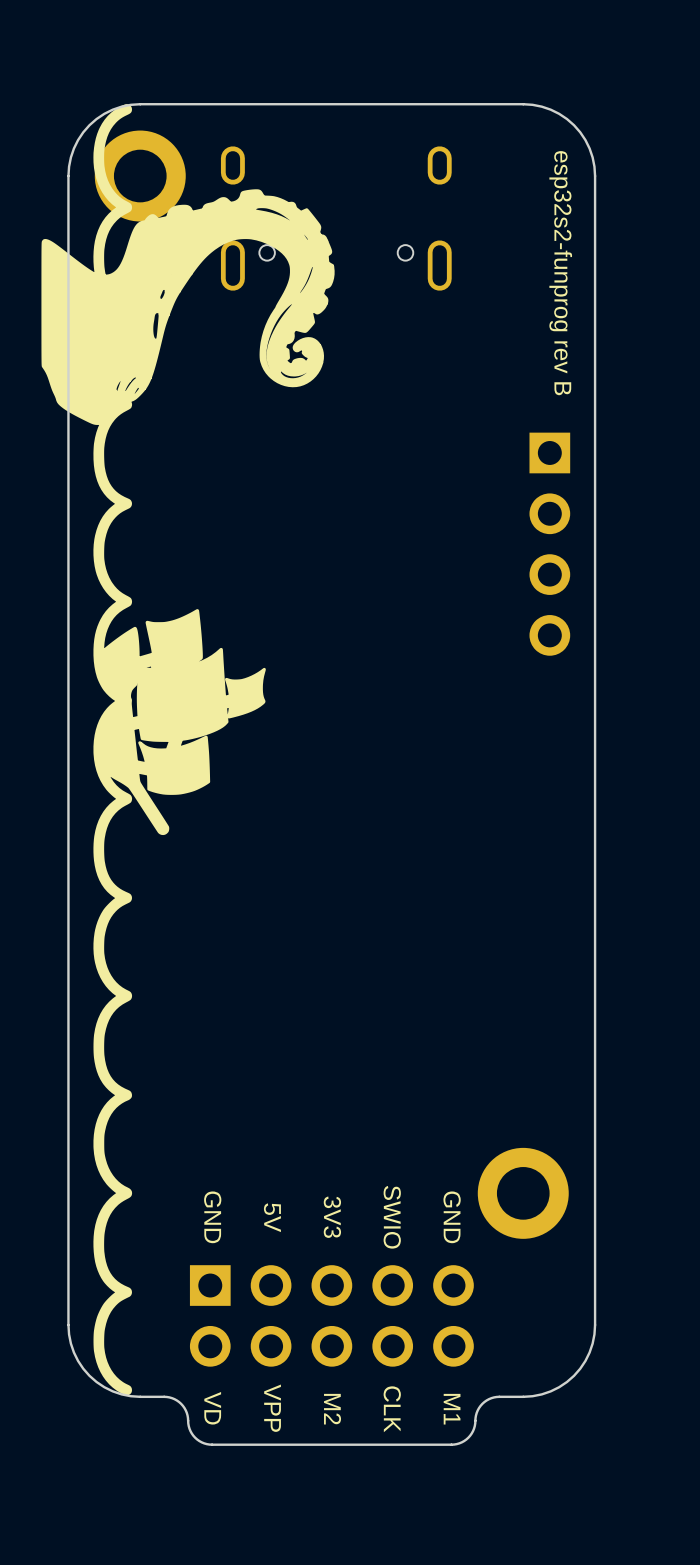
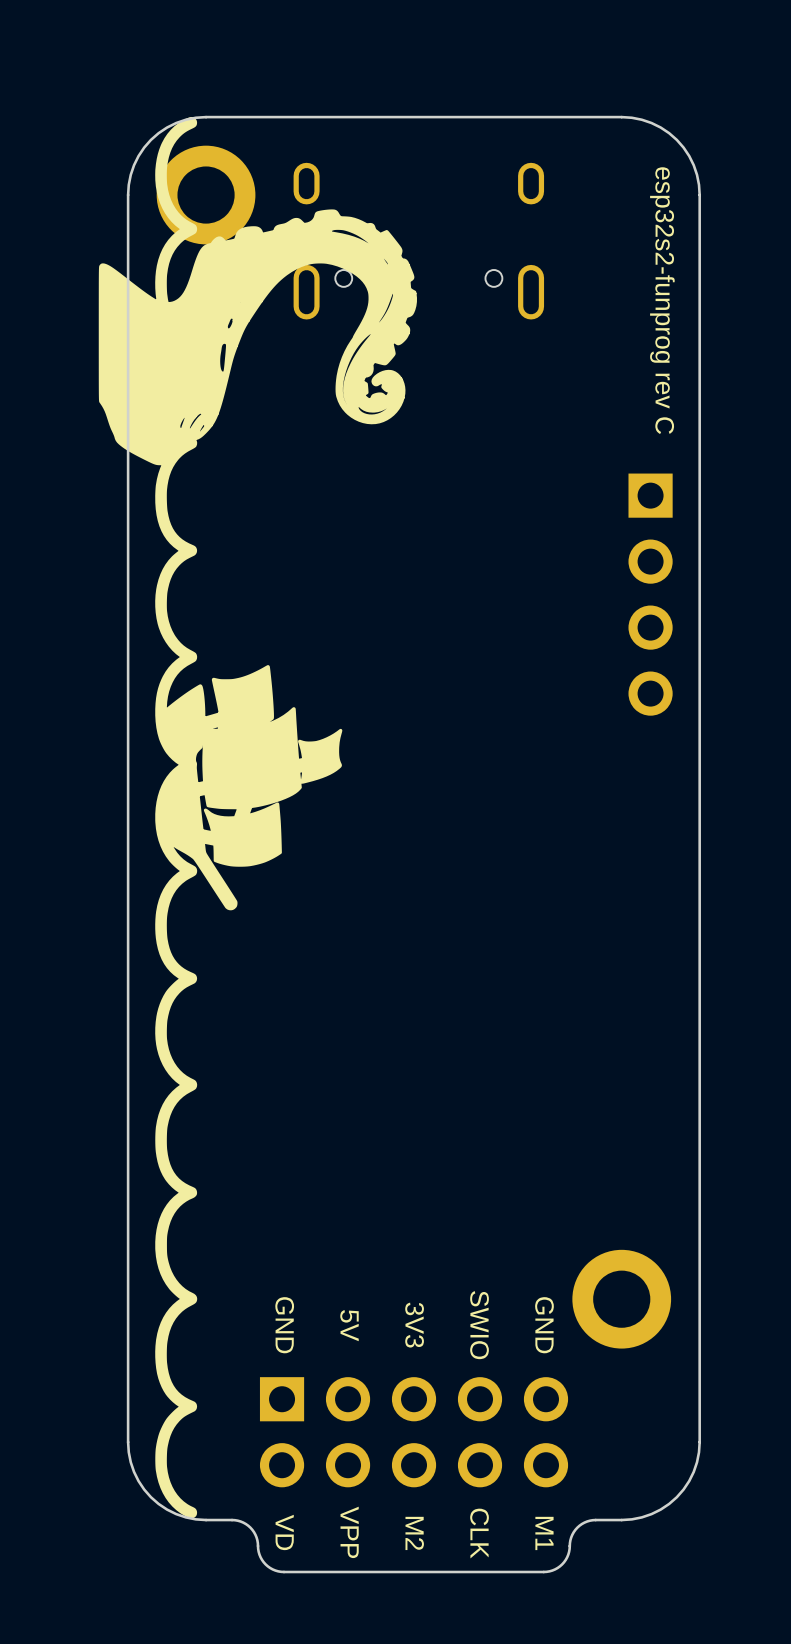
text: esp32s2-funprog rev B (560, 273) -> esp32s2-funprog rev C (662, 300)

